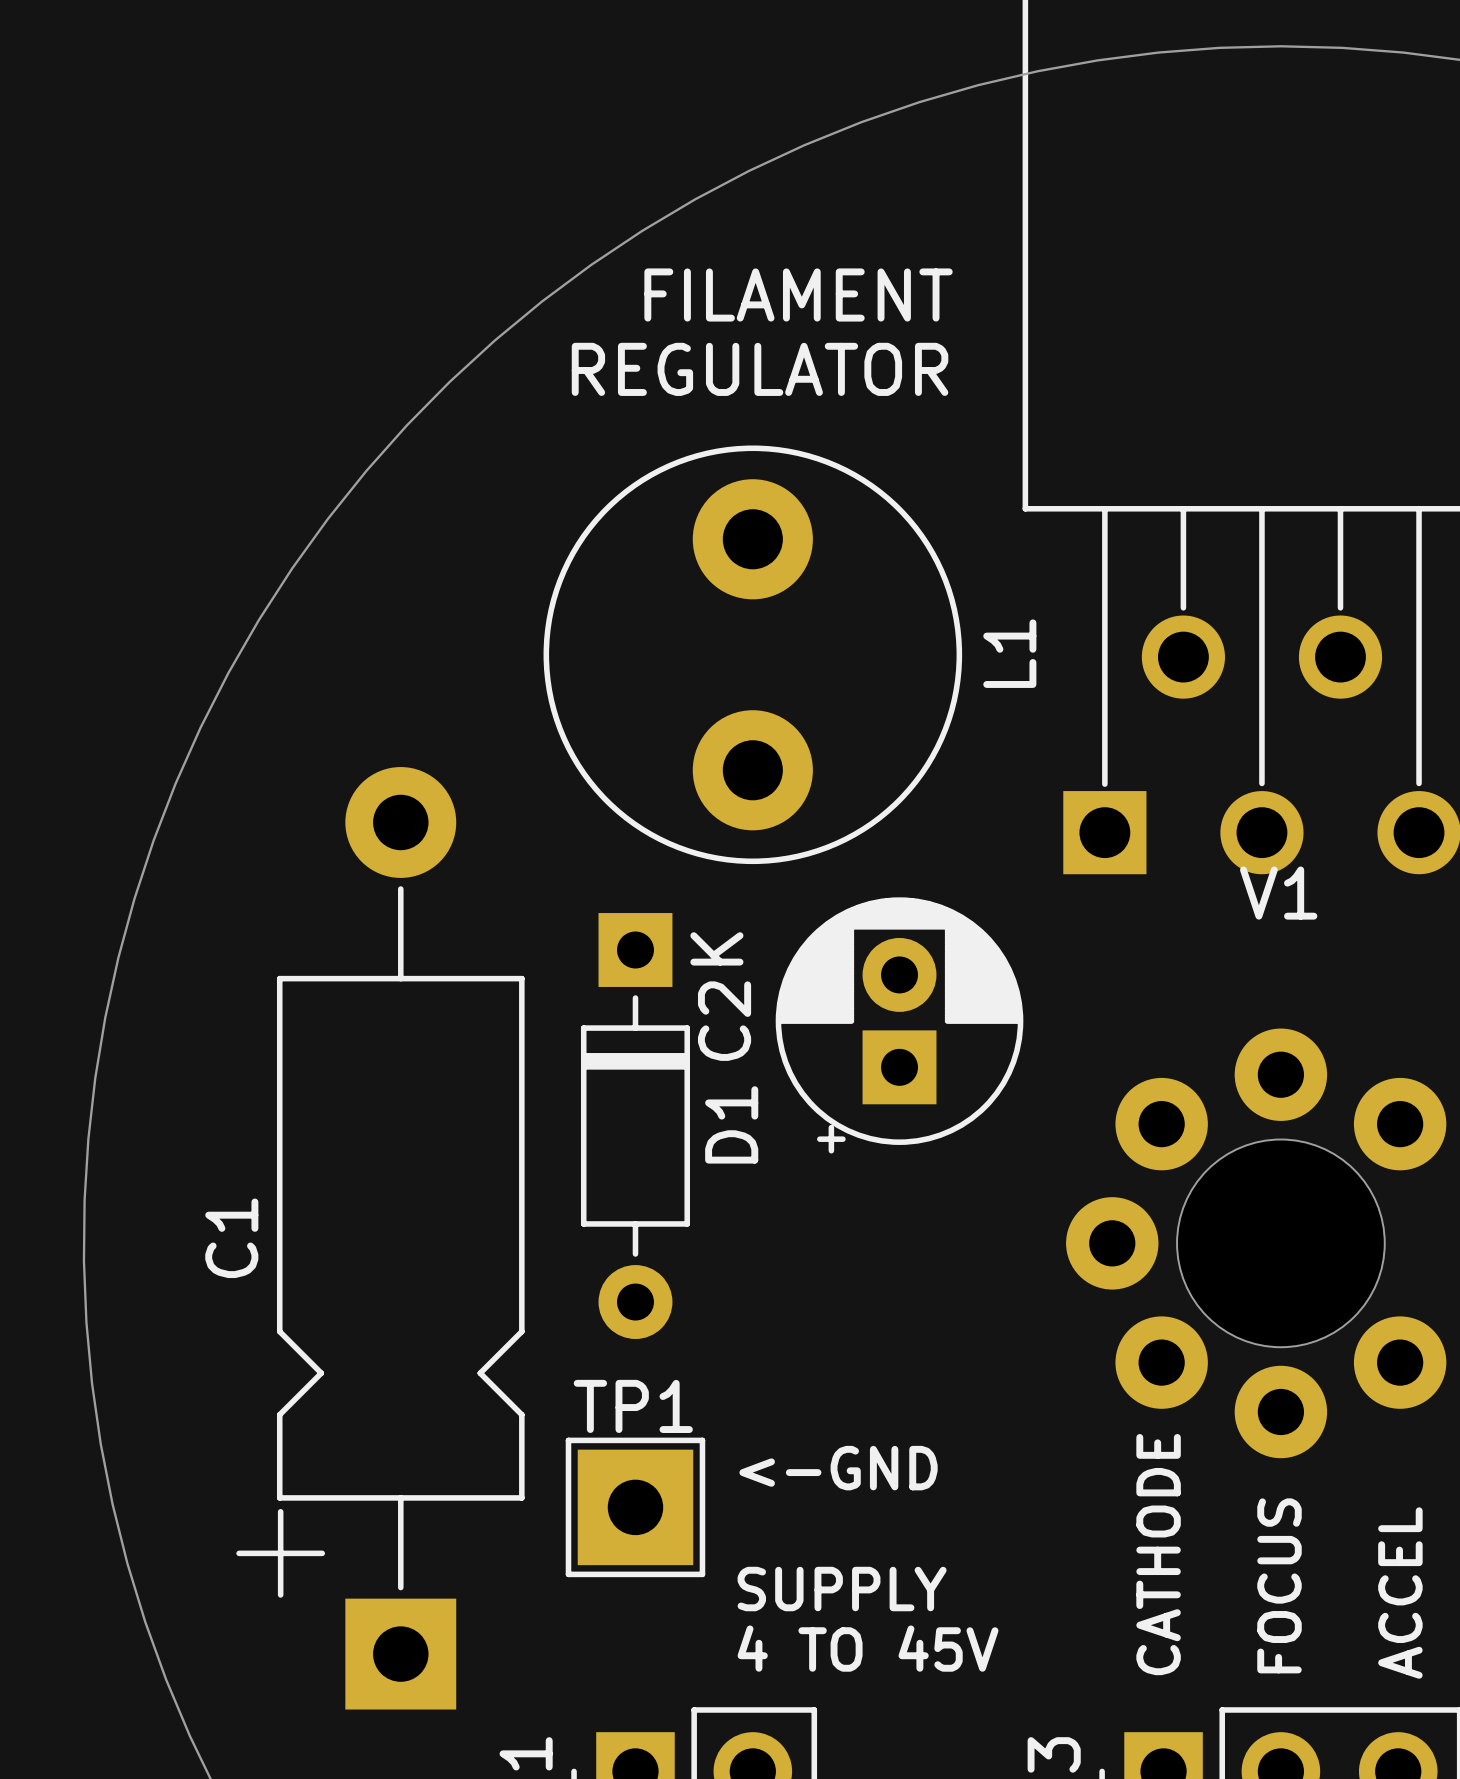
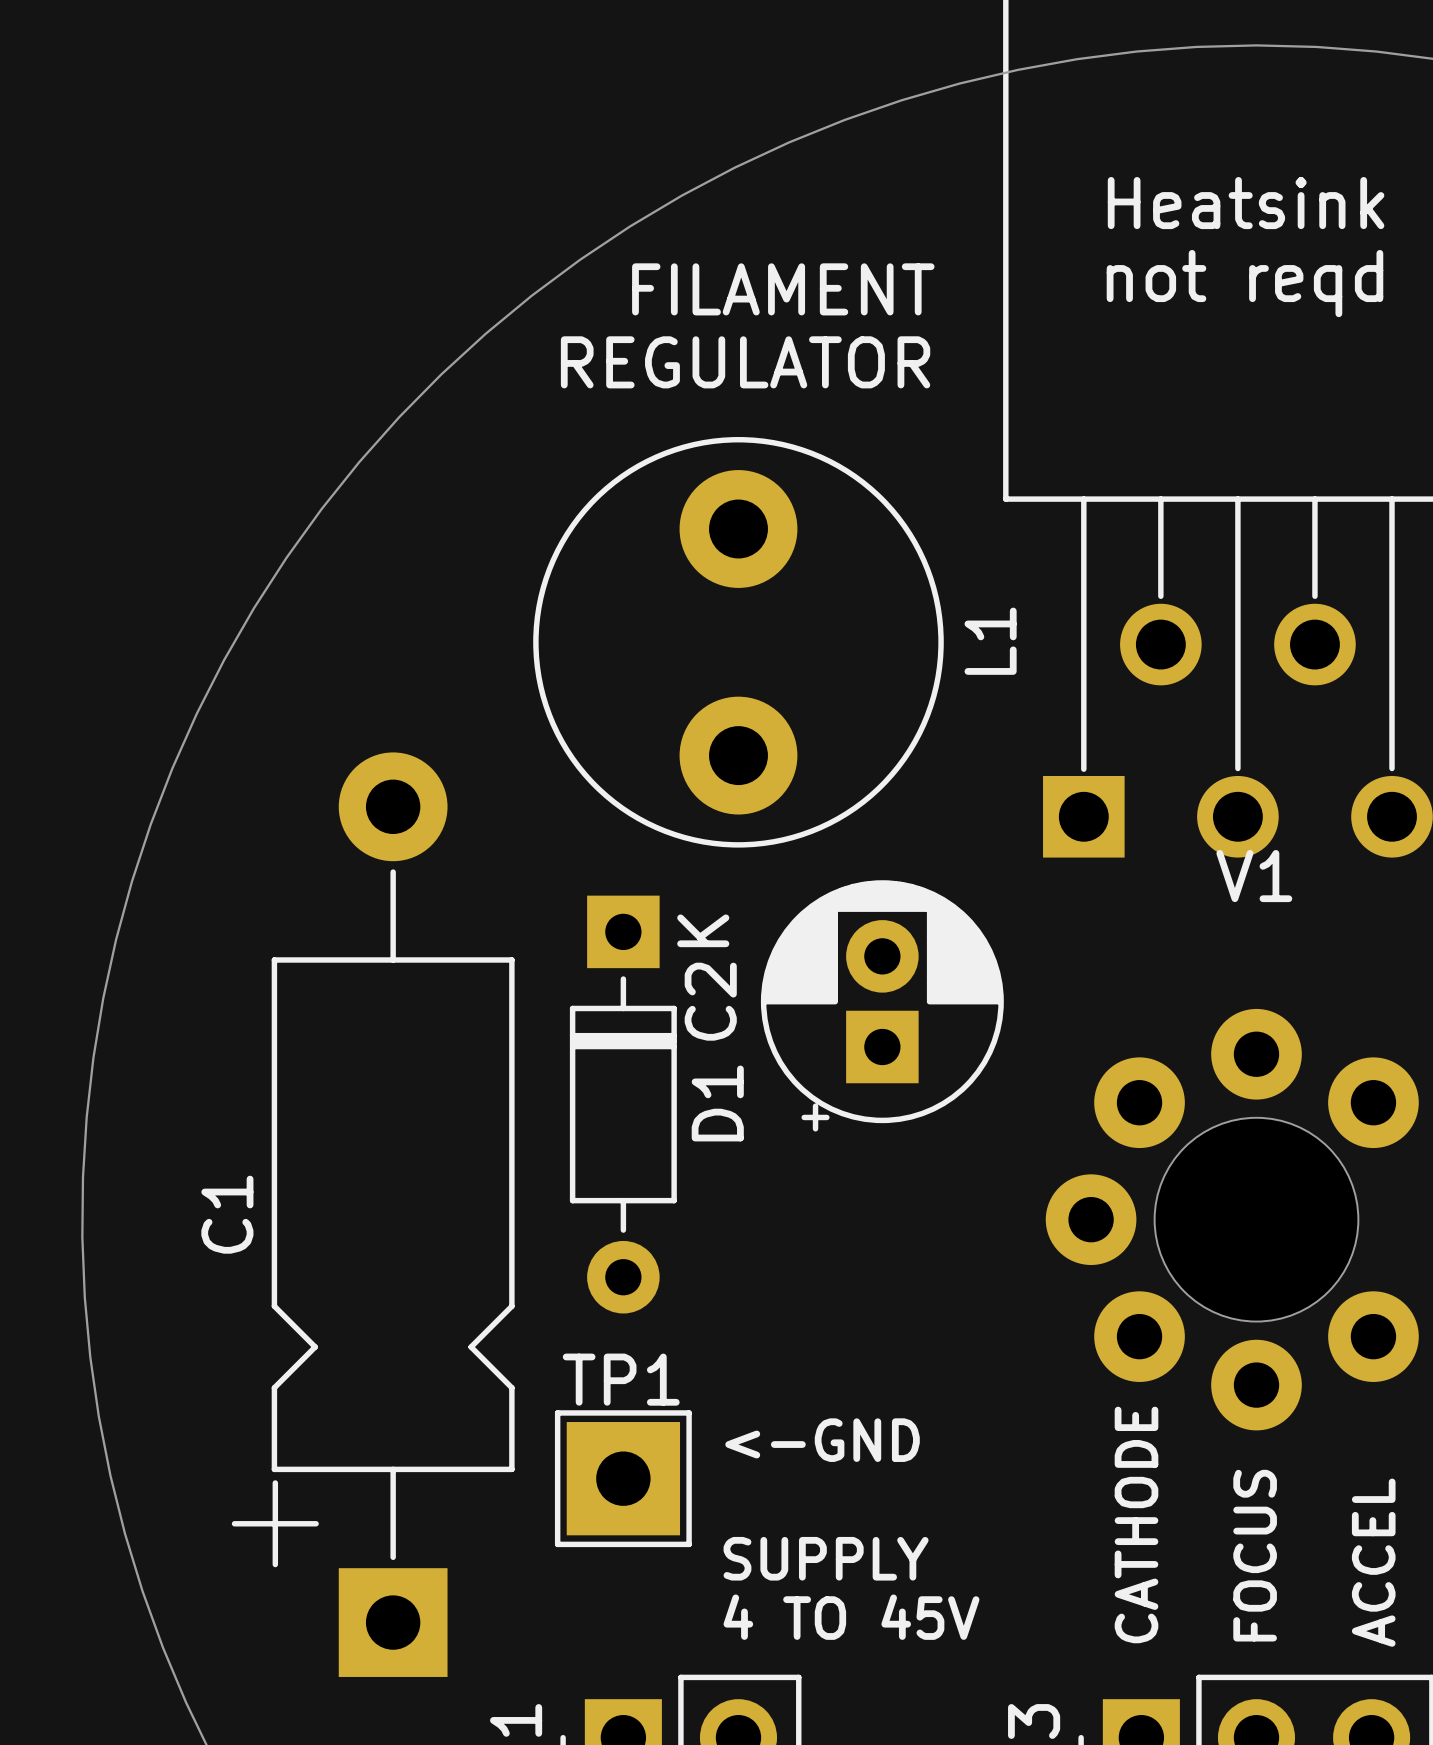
text: none -> Heatsink (1246, 203)
text: none -> not reqd (1244, 283)

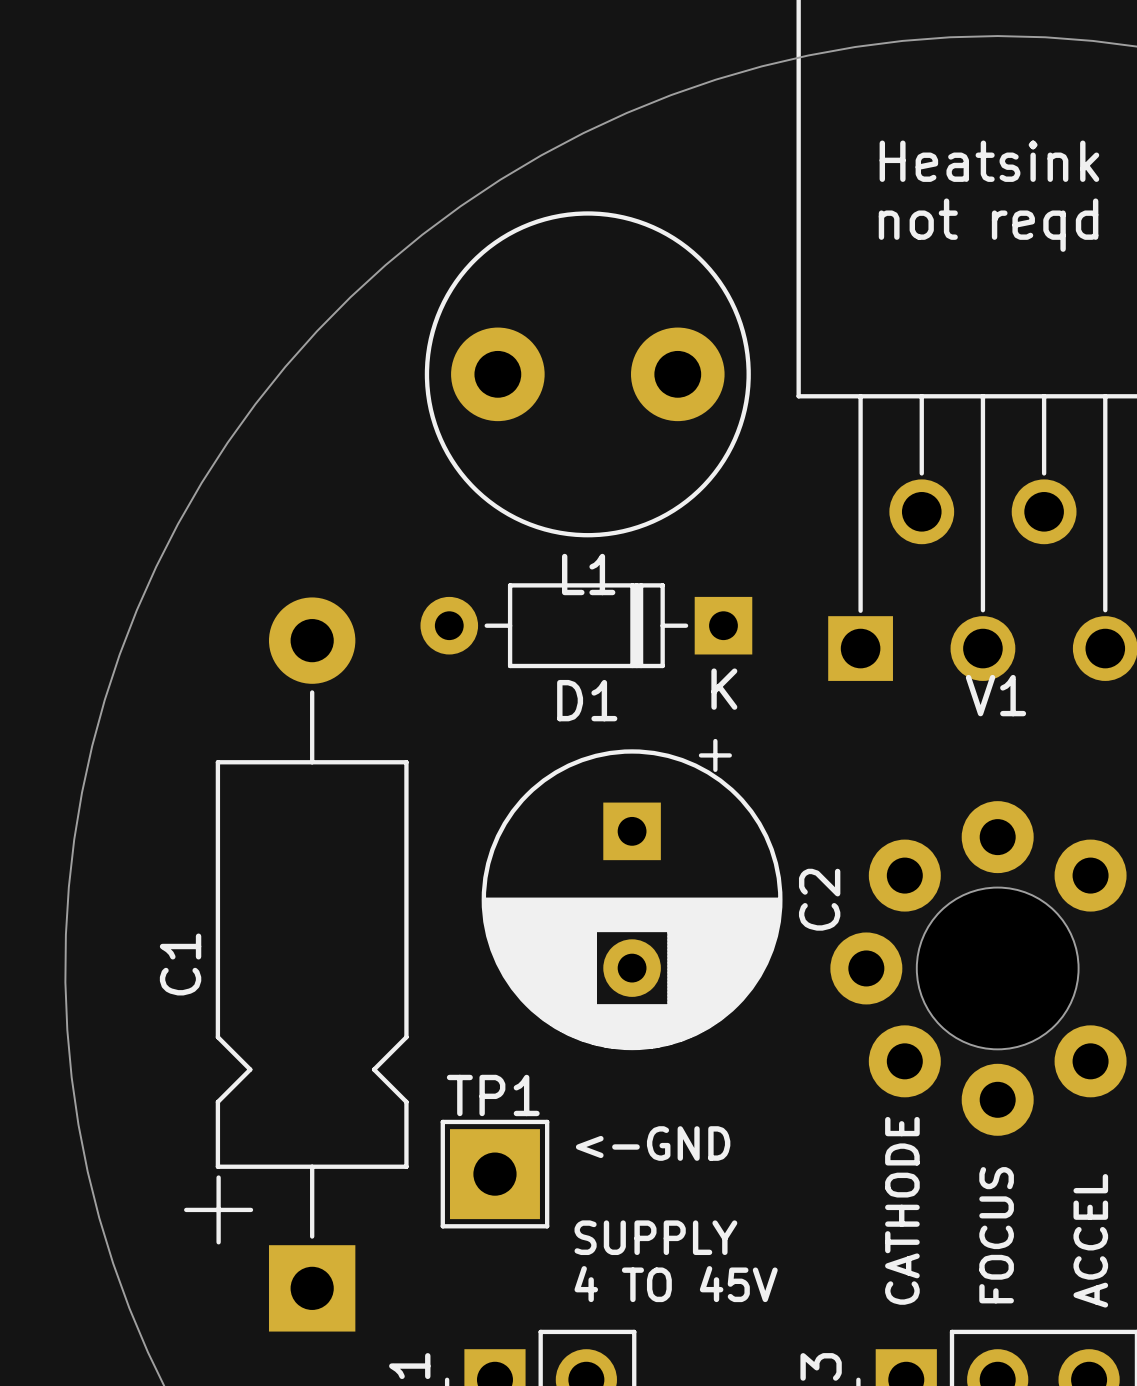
text: FILAMENT (783, 289) -> none
text: REGULATOR (745, 362) -> none
L1 rotation: 0° (738, 642) -> 90° clockwise (587, 374)
C2 footprint: [760, 880, 1004, 1132] -> [481, 738, 783, 1051]
C2 name position: C2 (710, 1001) -> C2 (819, 899)
D1 rotation: 0° (623, 1104) -> 90° clockwise (586, 625)
D1 position: (623, 1104) -> (586, 625)

